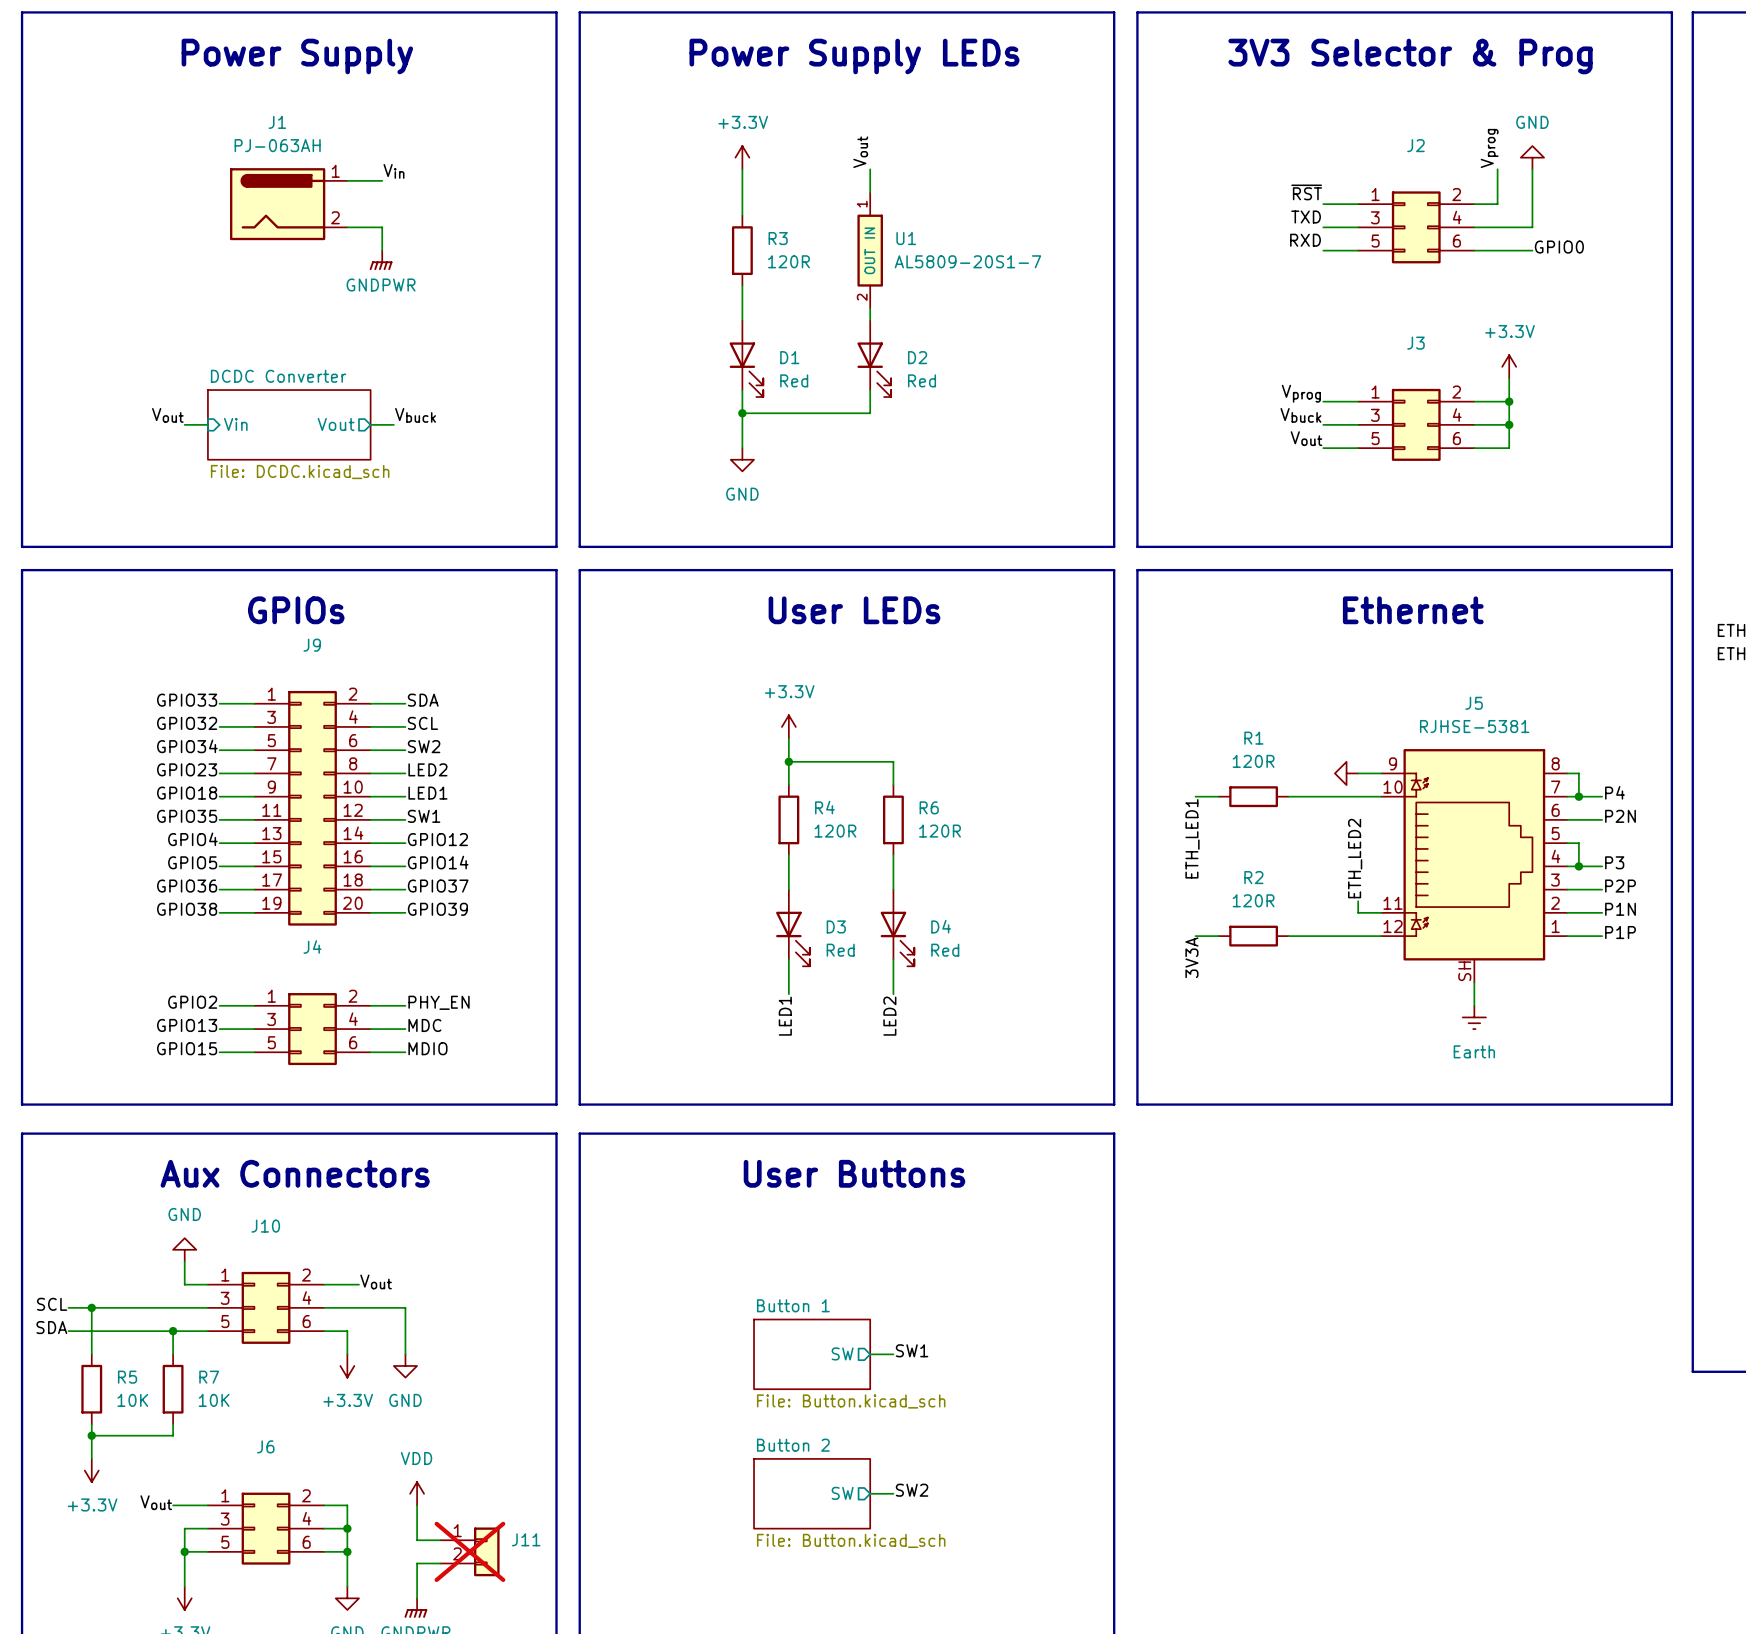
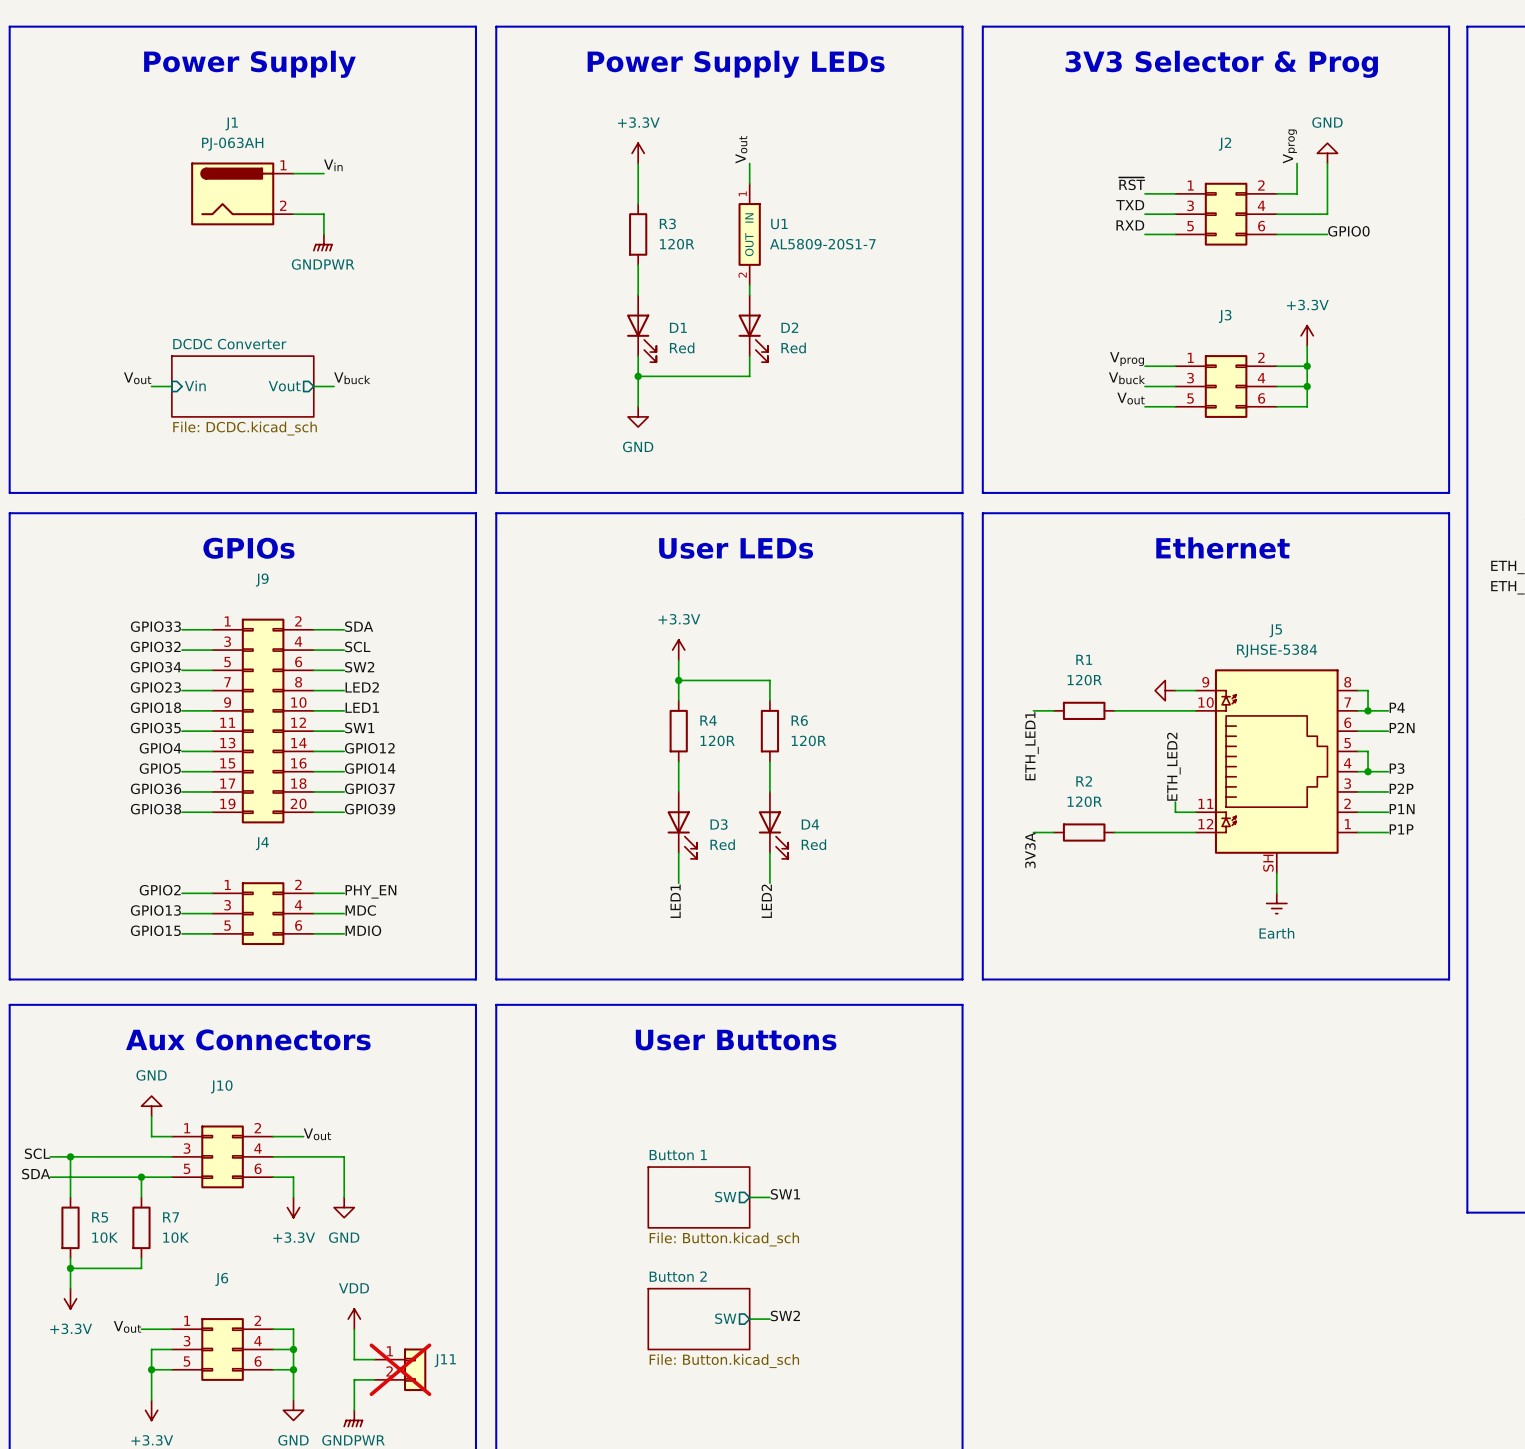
J5 value: RJHSE-5381 (1474, 726) -> RJHSE-5384 (1277, 650)

